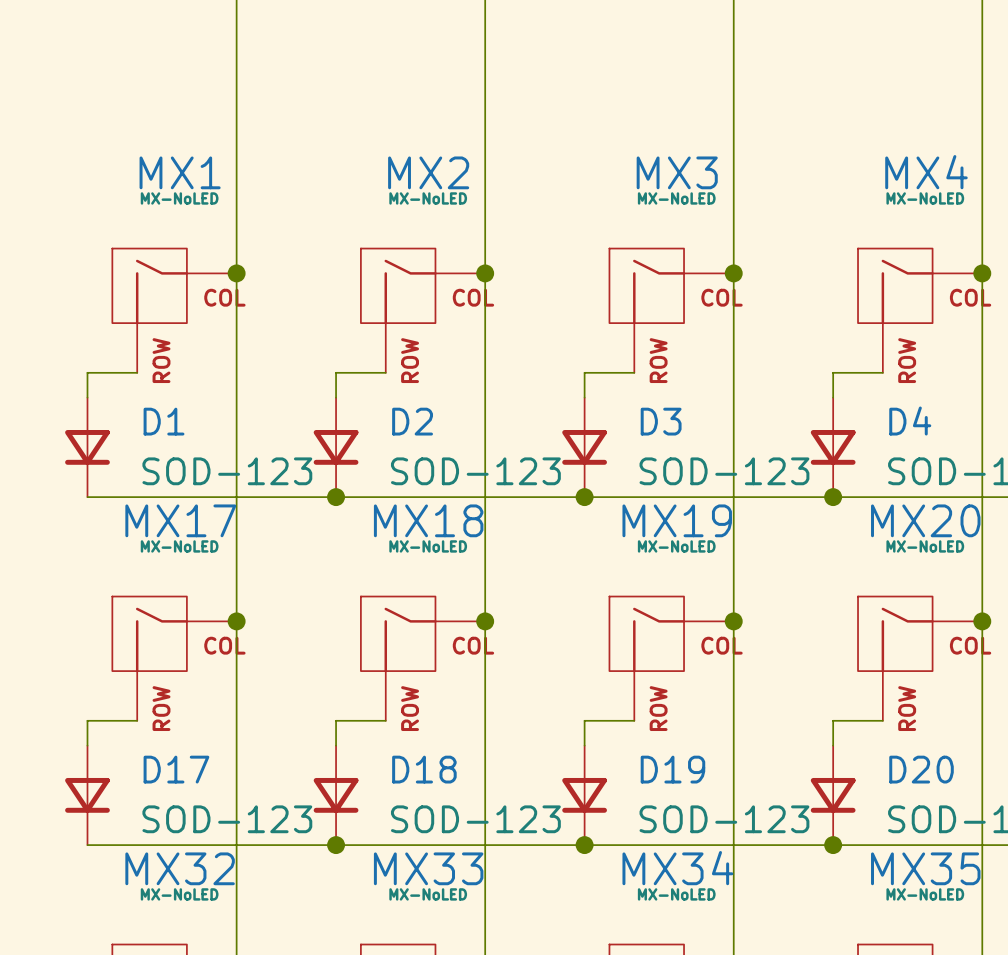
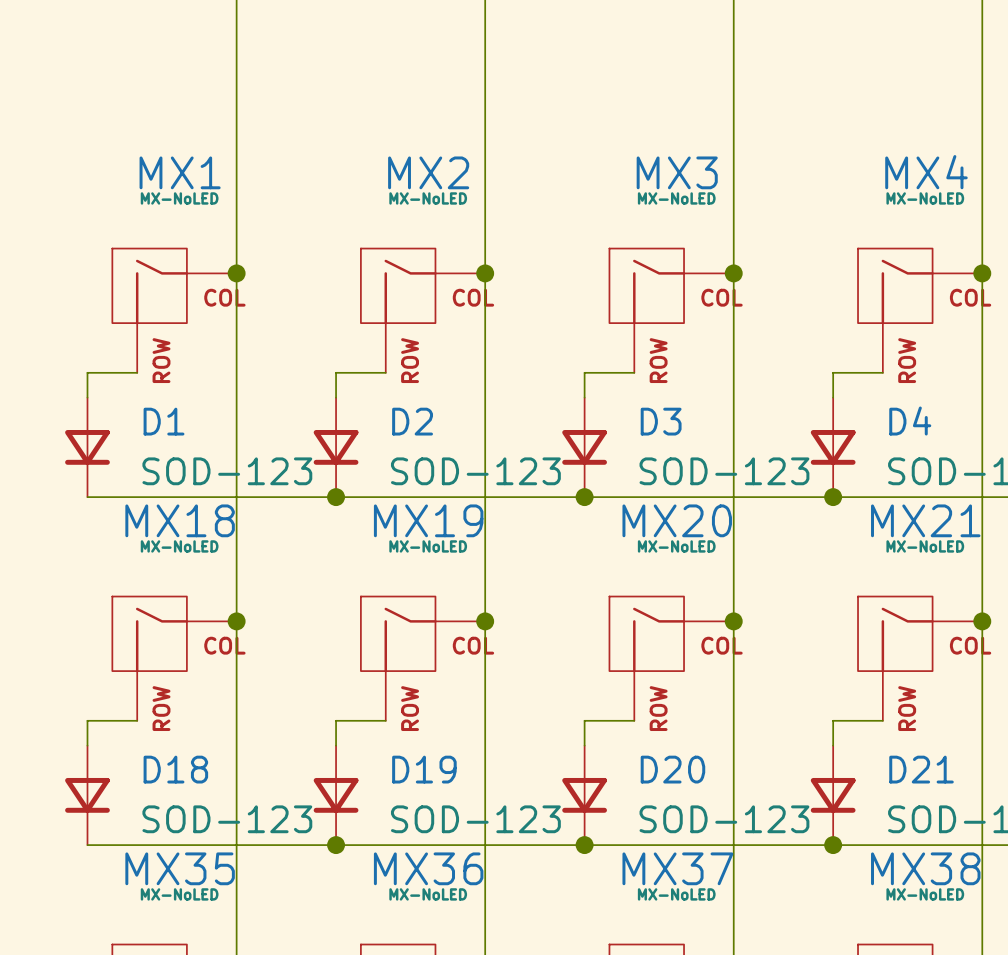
MX17 name: MX17 (180, 520) -> MX18 (180, 520)
MX18 name: MX18 (428, 520) -> MX19 (428, 520)
MX19 name: MX19 (677, 520) -> MX20 (677, 520)
MX20 name: MX20 (925, 520) -> MX21 (925, 520)
D17 name: D17 (176, 769) -> D18 (175, 769)
D18 name: D18 (424, 769) -> D19 (424, 769)
D19 name: D19 (672, 769) -> D20 (672, 769)
D20 name: D20 (921, 769) -> D21 (921, 769)
MX32 name: MX32 (180, 868) -> MX35 (180, 868)
MX33 name: MX33 (428, 868) -> MX36 (428, 868)
MX34 name: MX34 (677, 868) -> MX37 (677, 868)
MX35 name: MX35 (925, 868) -> MX38 (925, 868)

